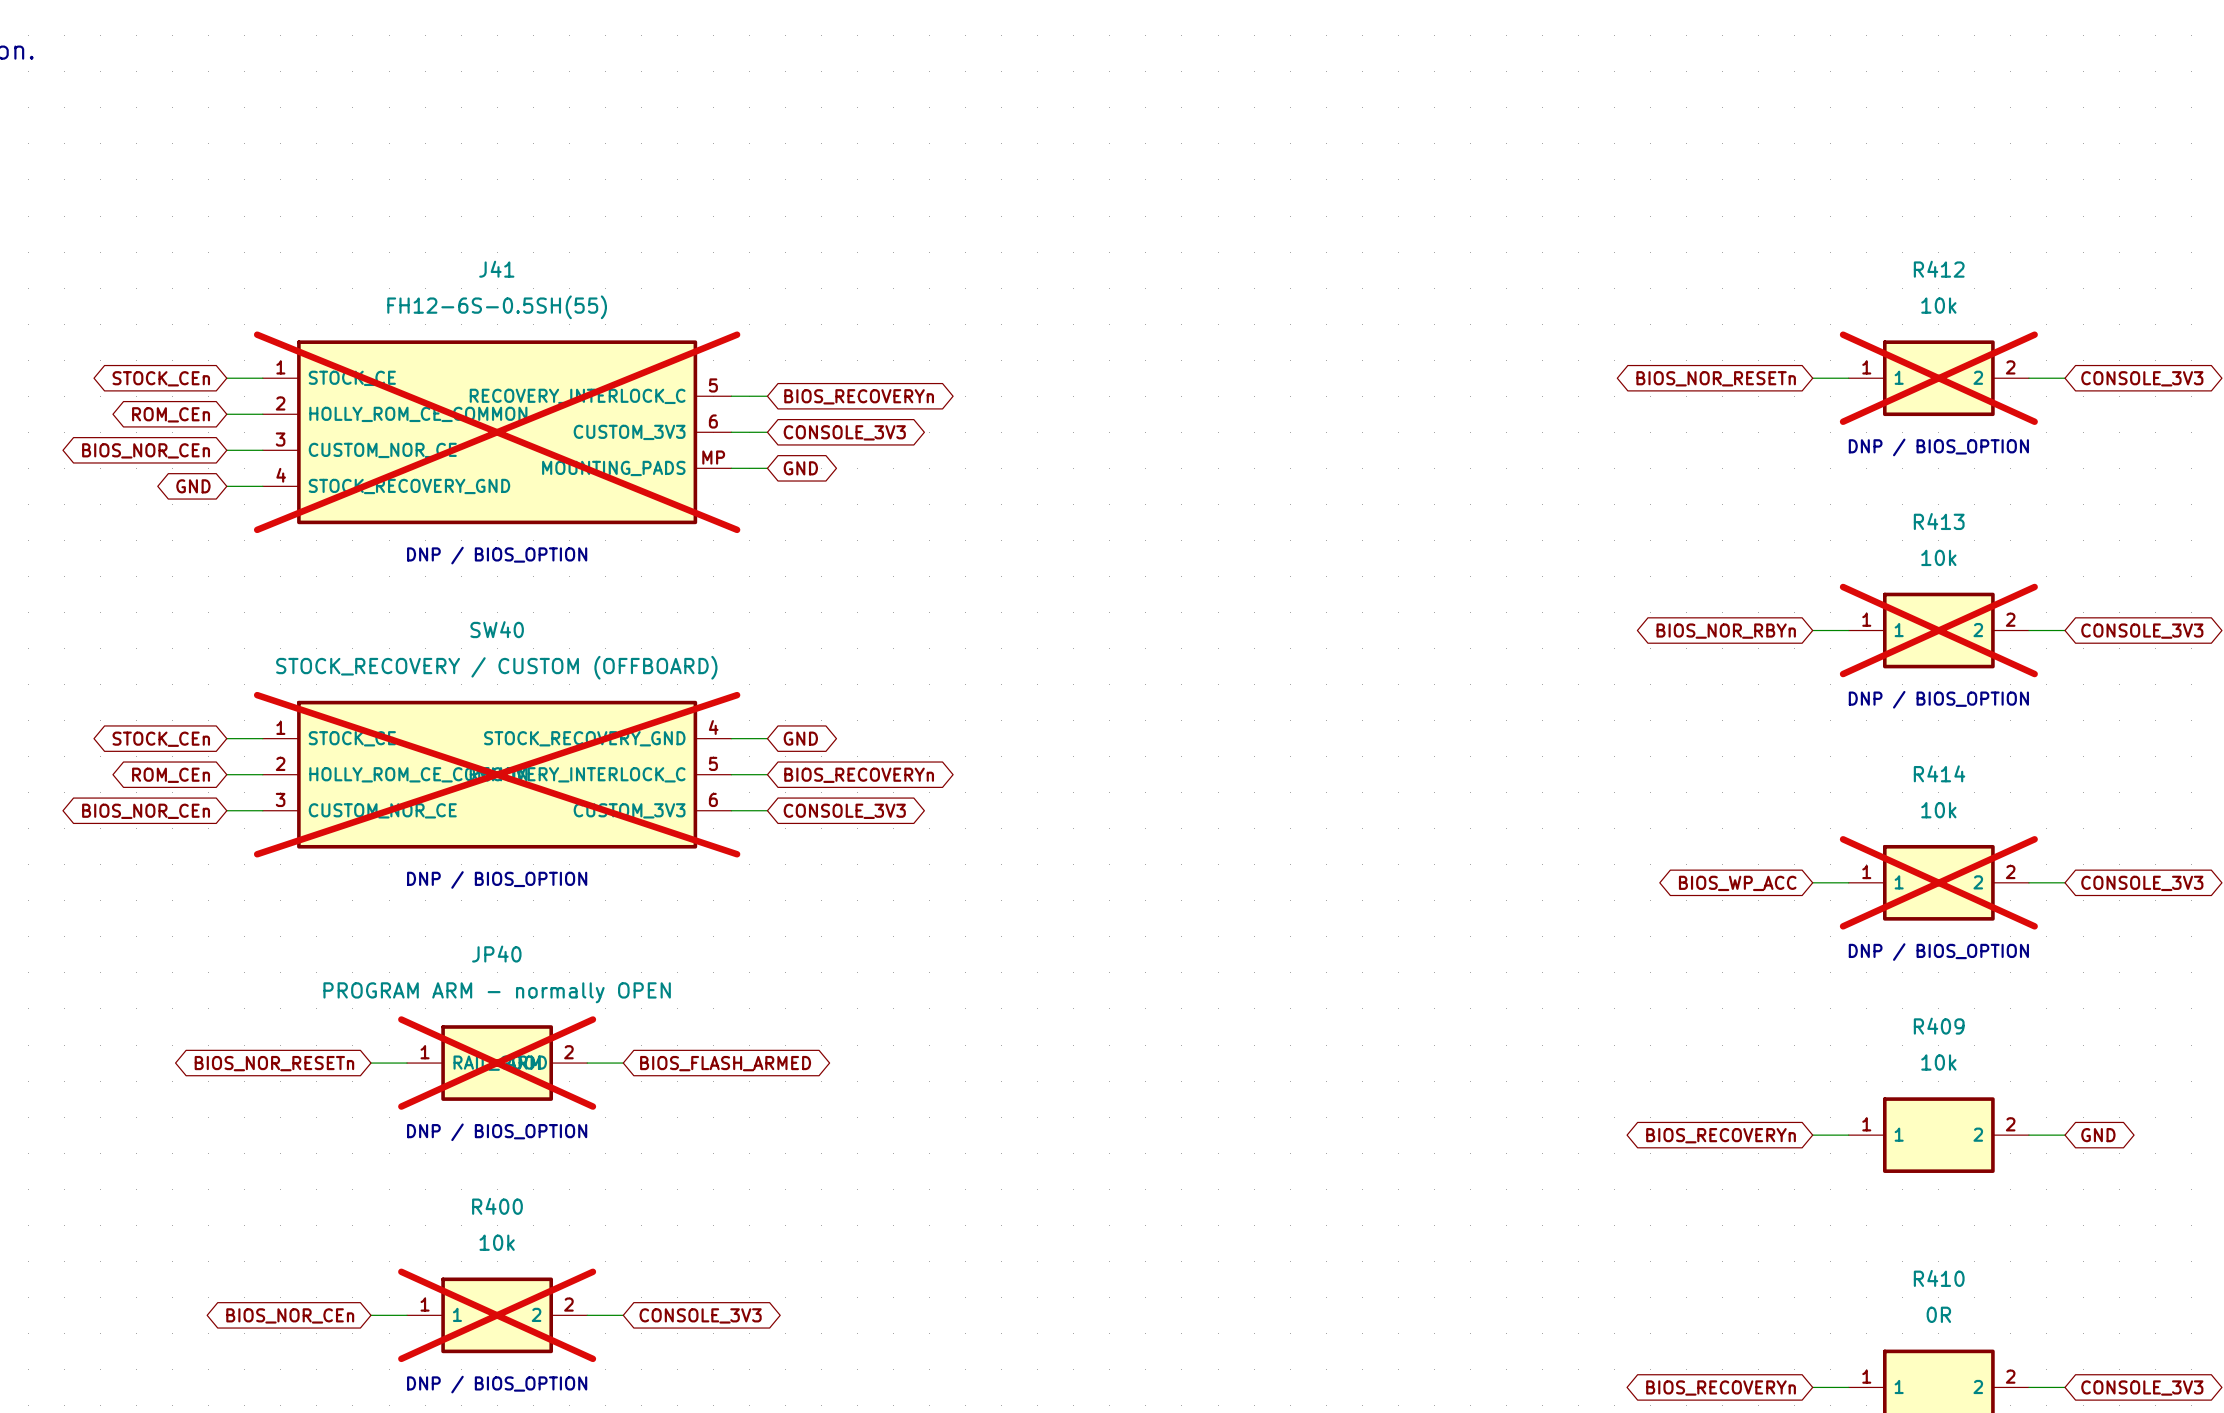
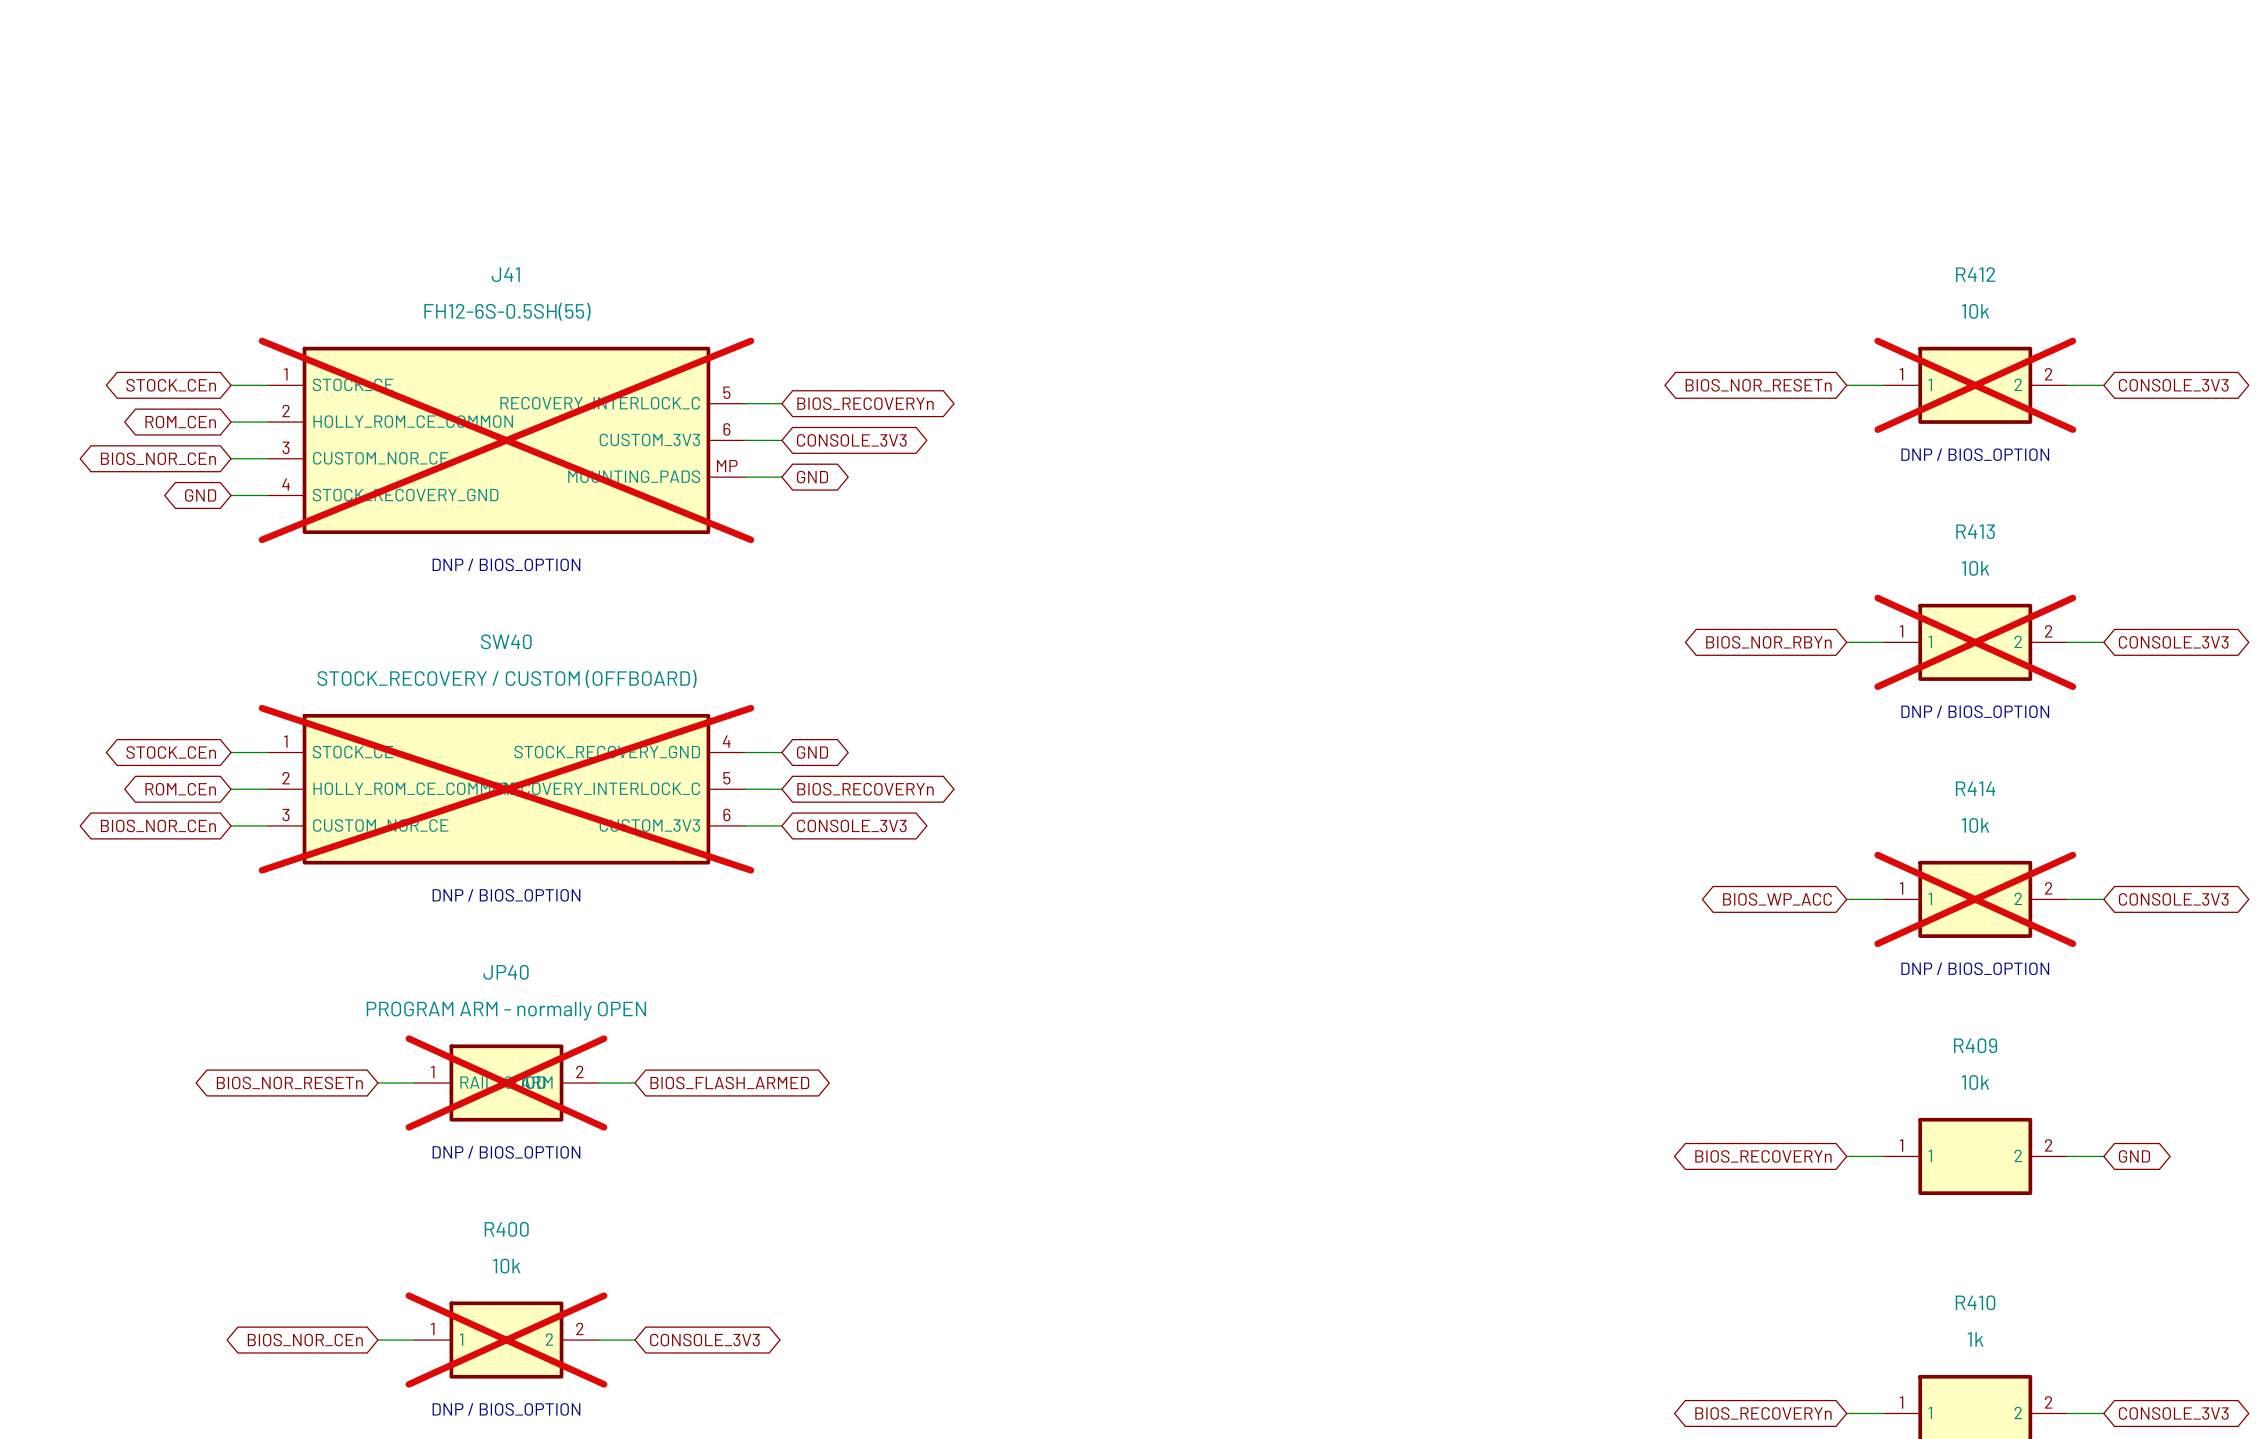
R410 value: 0R (1938, 1314) -> 1k (1975, 1339)

